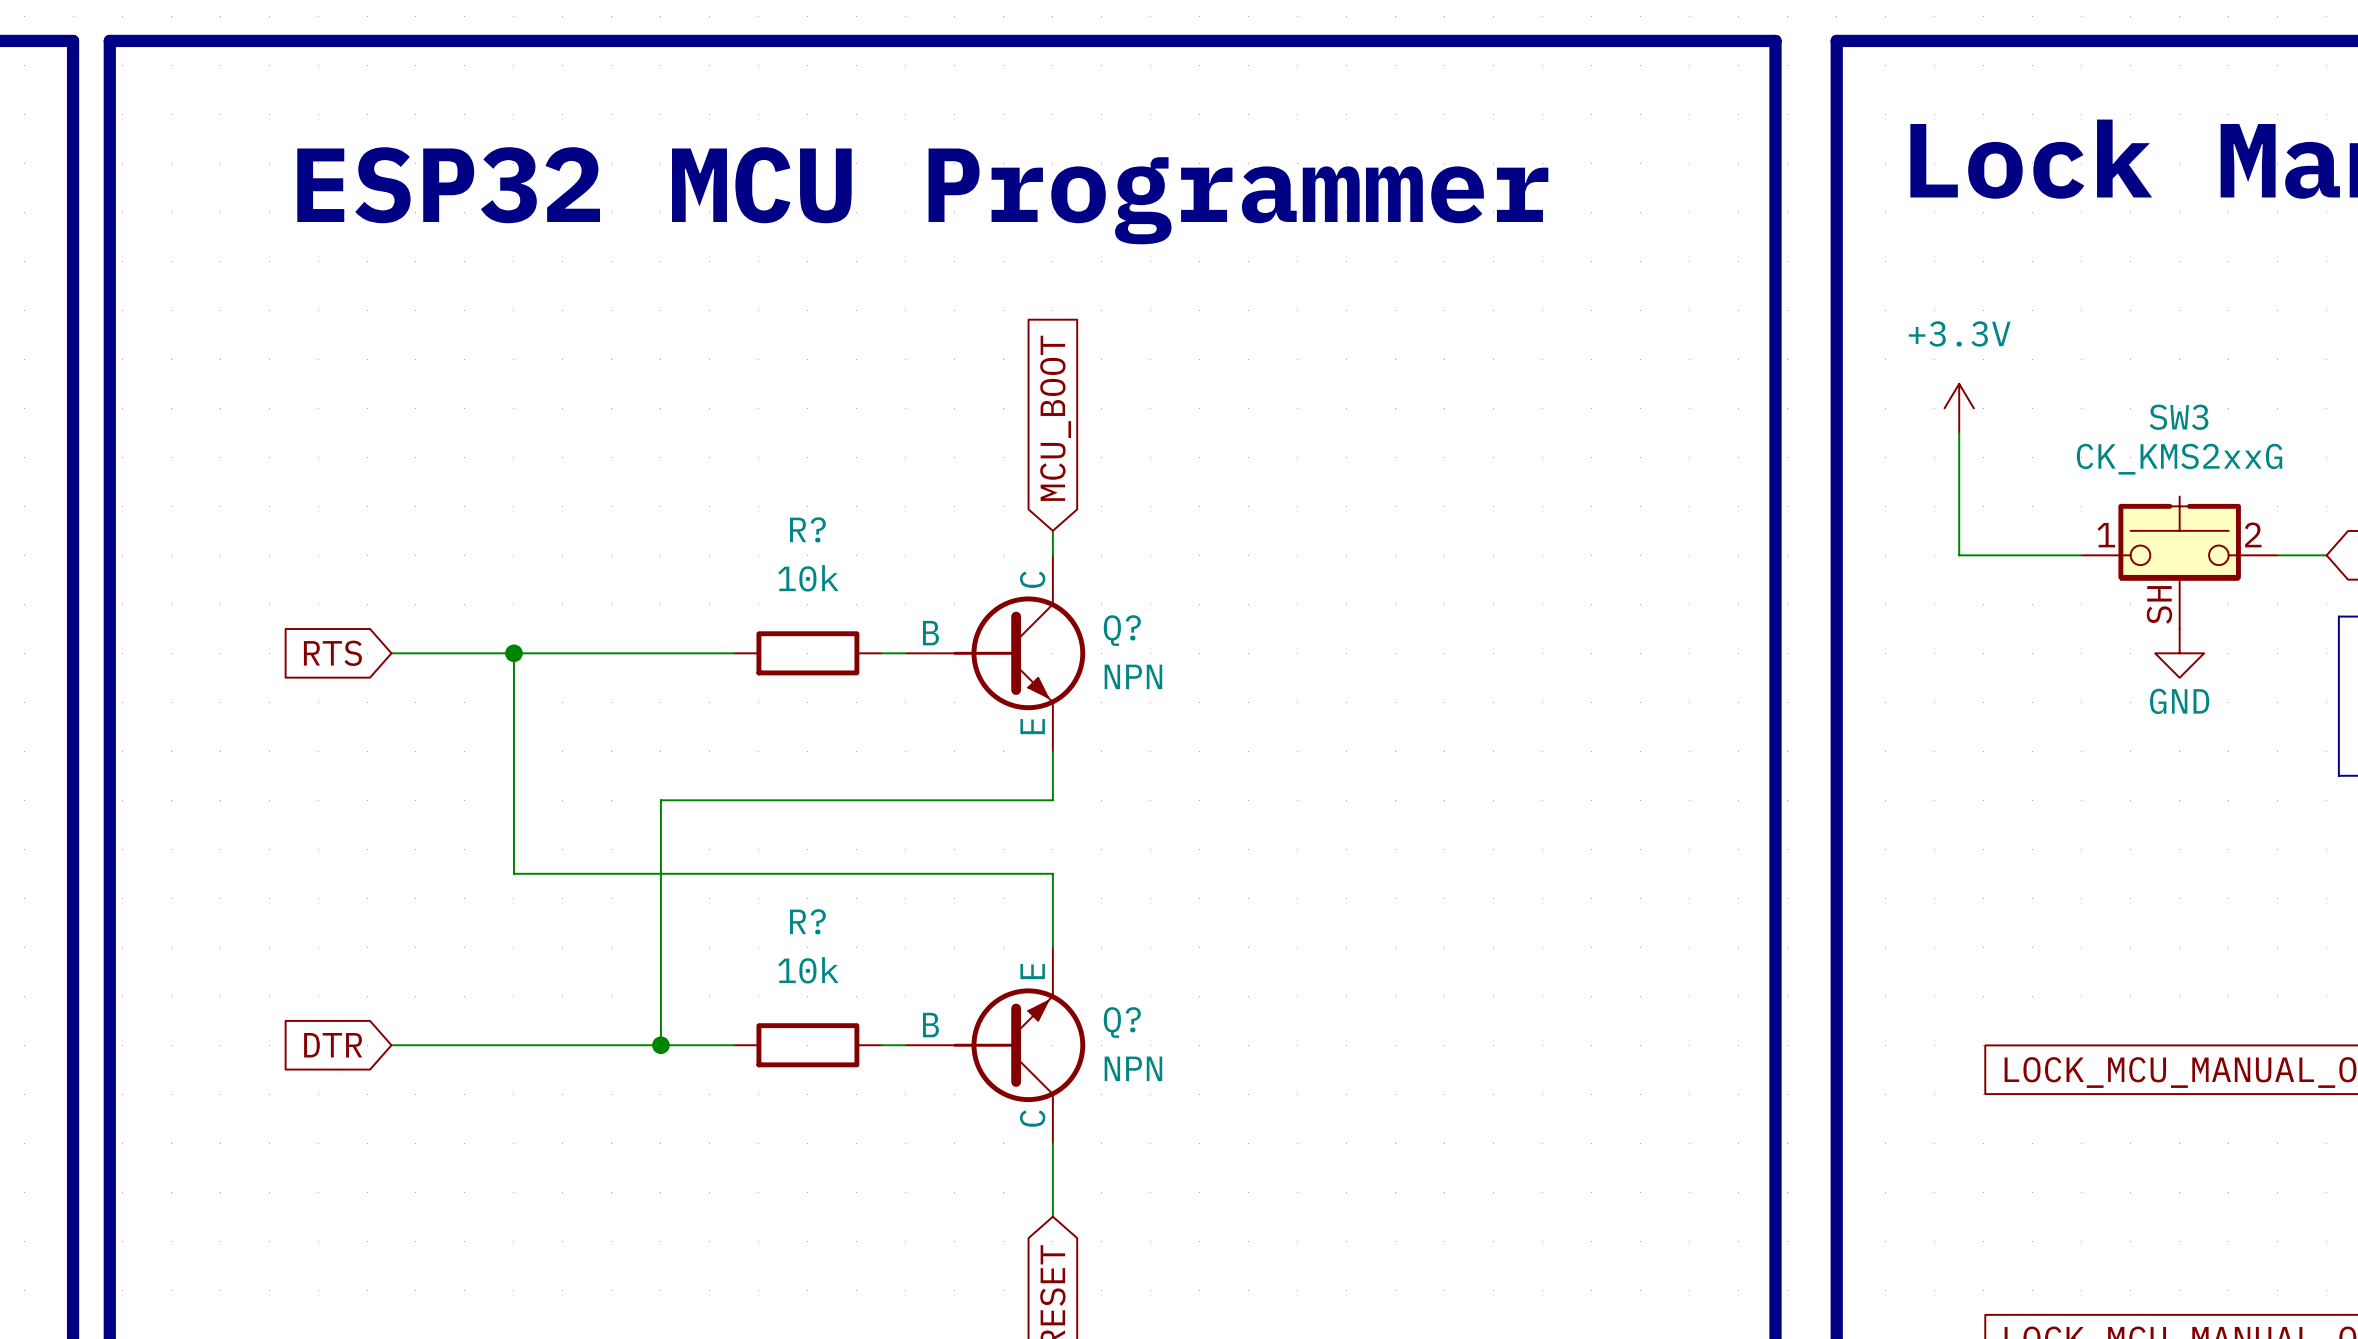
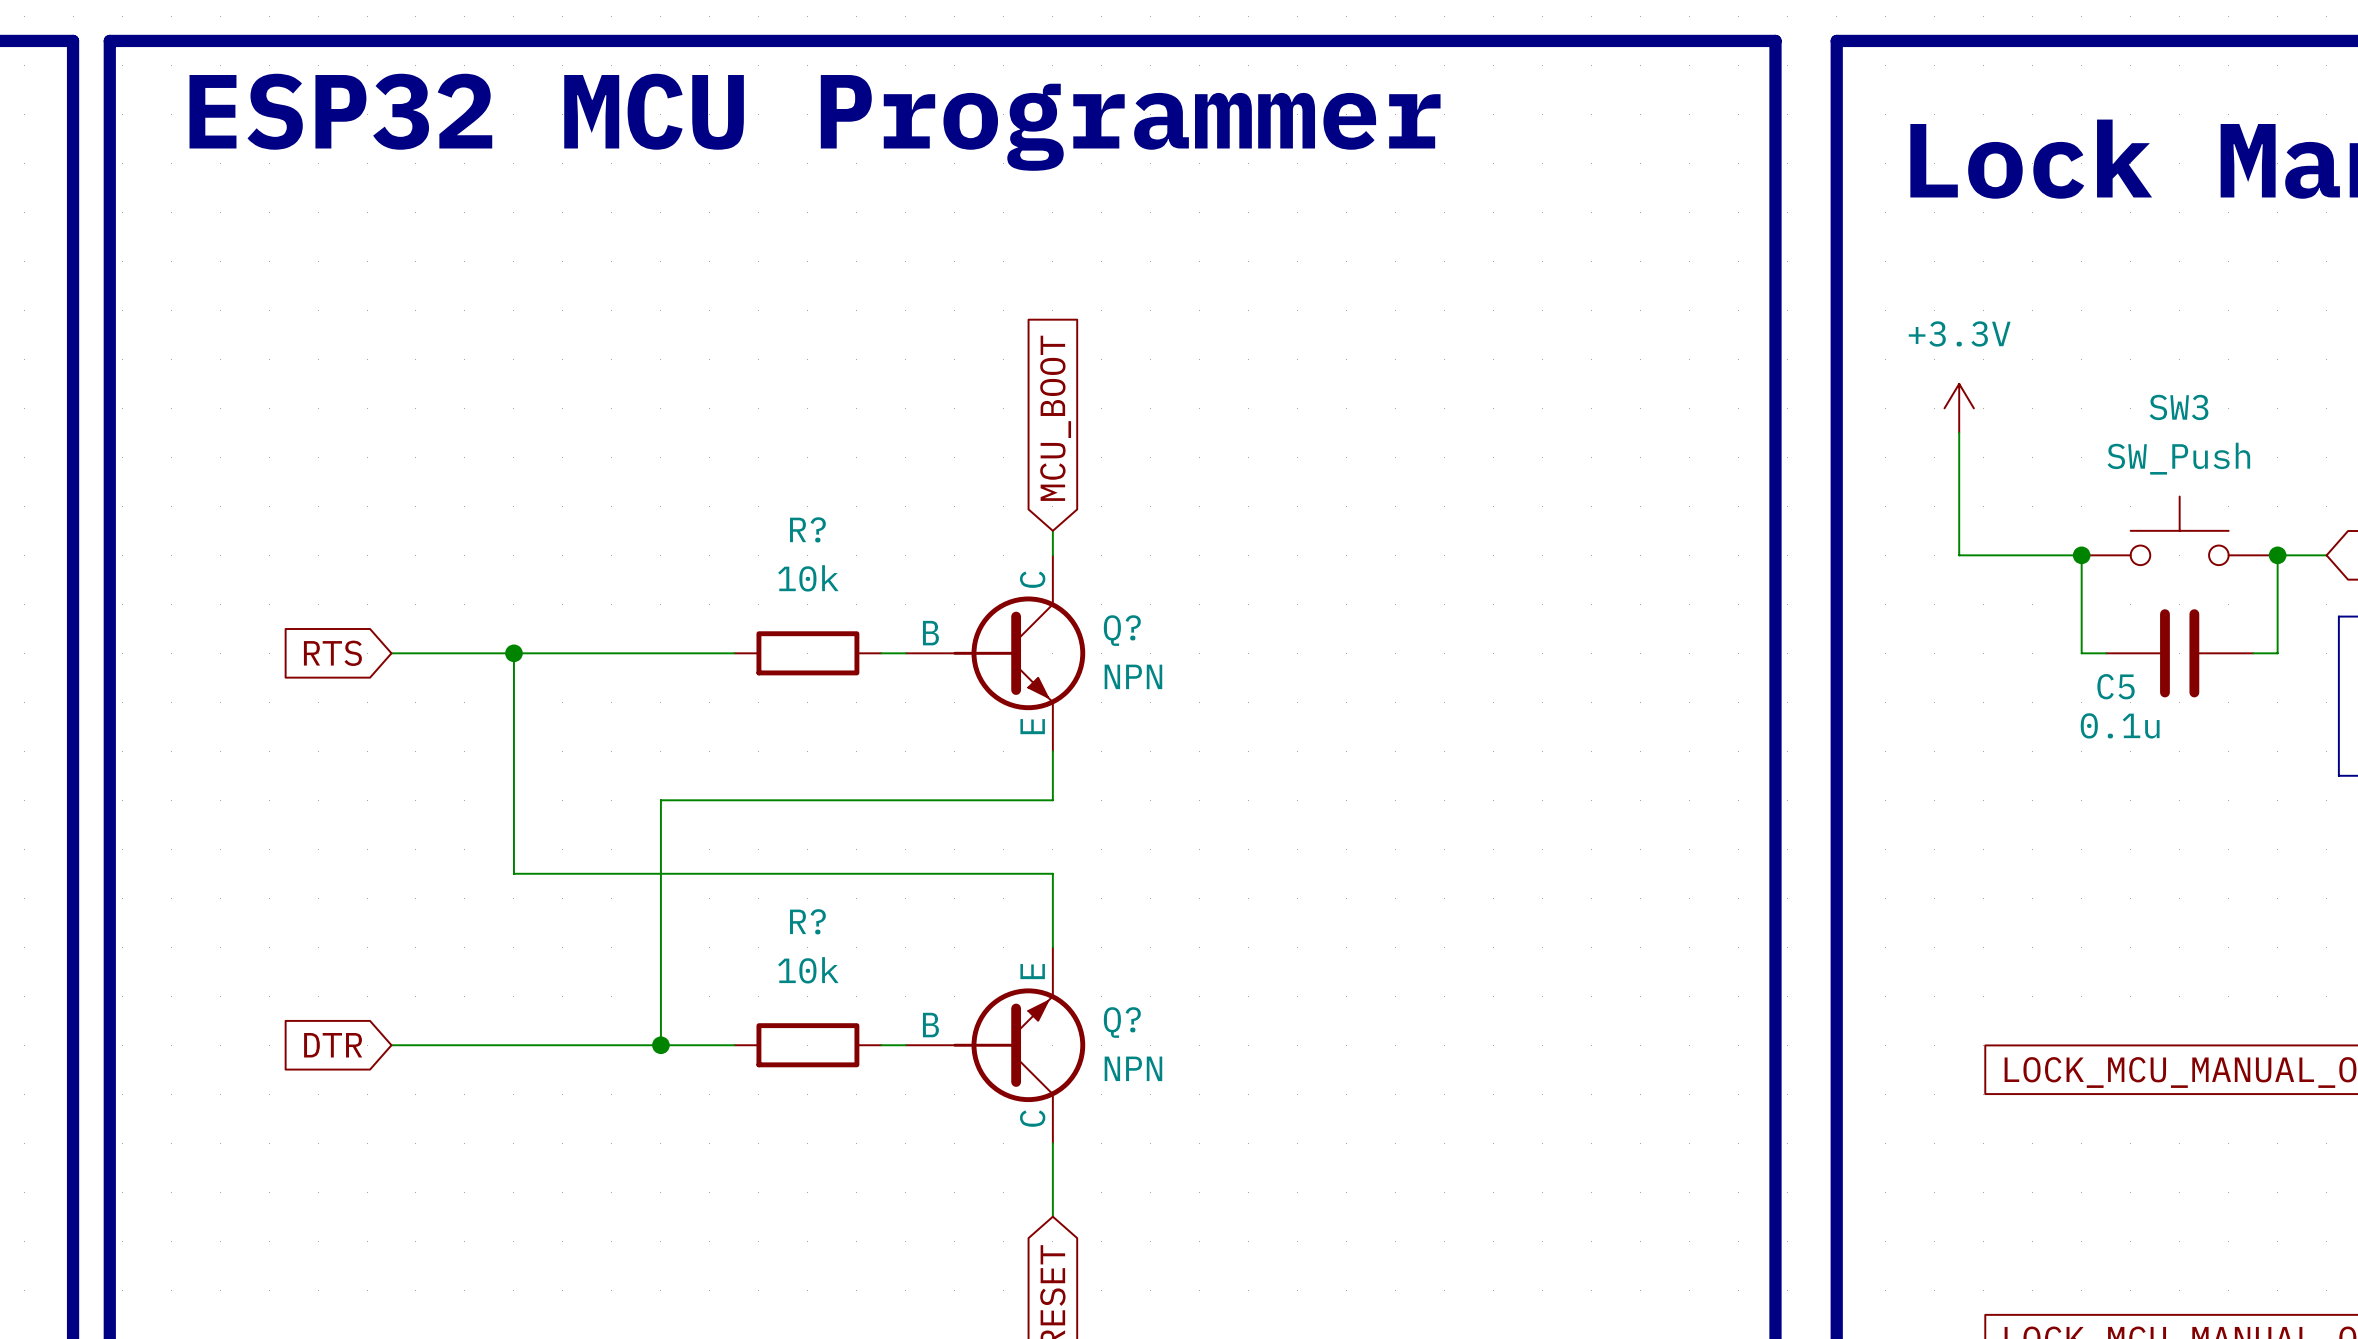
text position: ESP32 MCU Programmer (922, 195) -> ESP32 MCU Programmer (815, 122)
SW3 value: CK_KMS2xxG (2179, 459) -> SW_Push (2178, 458)
SW3 symbol: [2081, 496, 2278, 629] -> [2081, 496, 2278, 566]
wire: none -> (2081, 555) (2081, 653) (2106, 653)
junction: none -> (2081, 555)
wire: none -> (2277, 555) (2277, 653) (2253, 653)
junction: none -> (2277, 555)
power symbol: GND (2179, 653) -> none
C5: none -> 0.1u (2179, 653)

